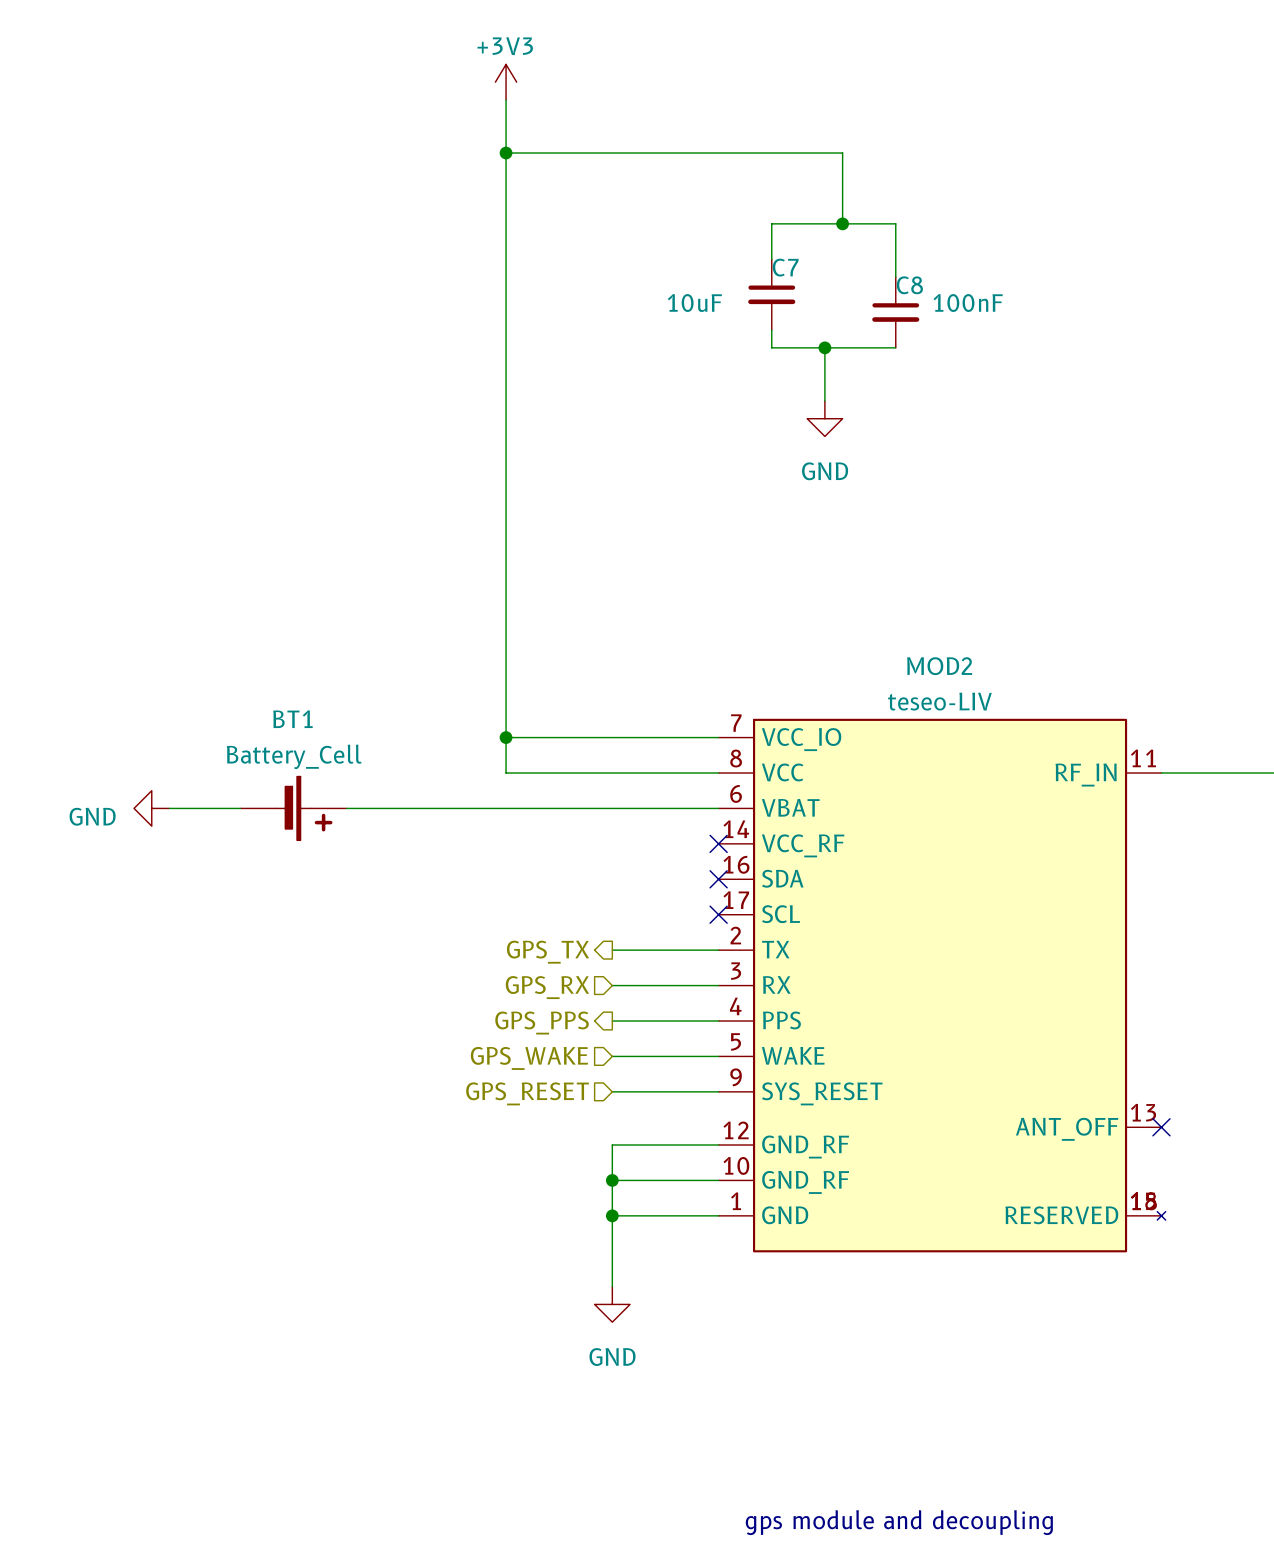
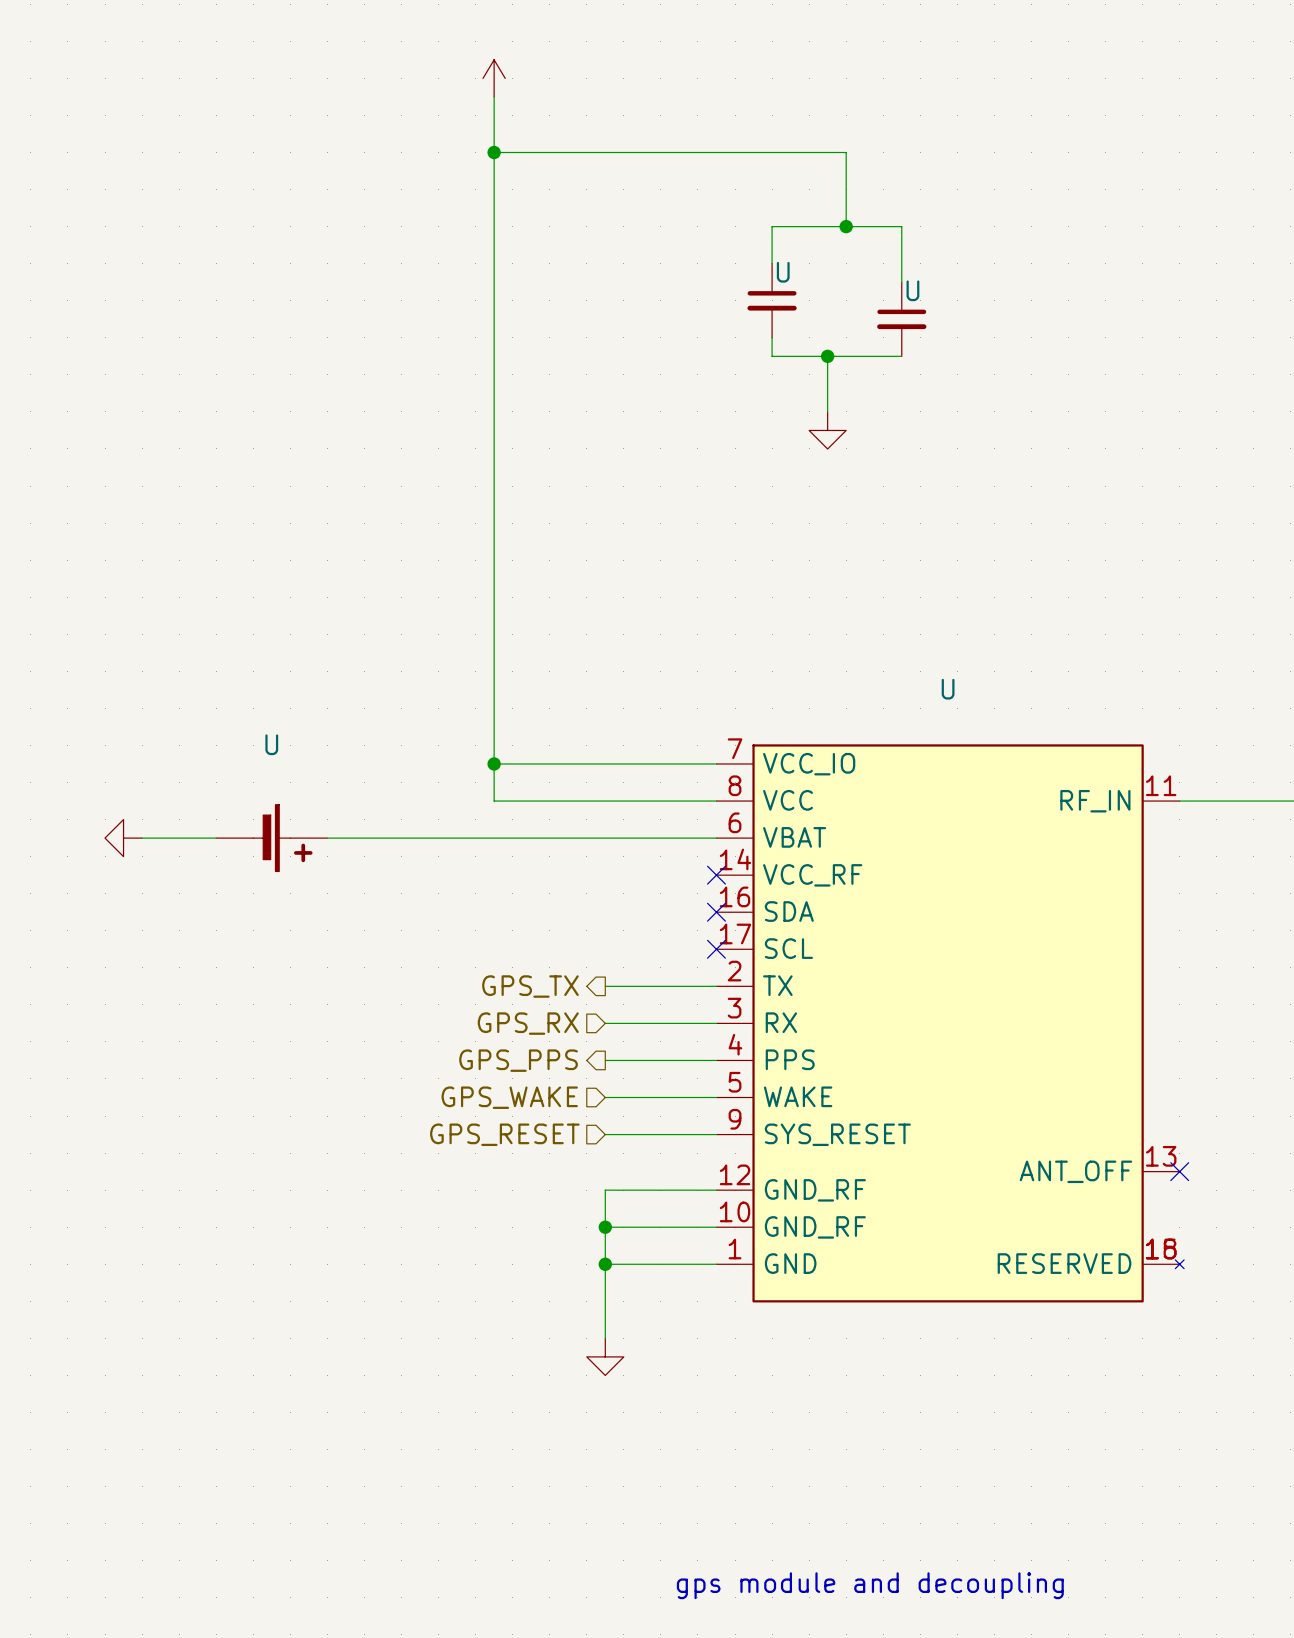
power symbol text: +3V3 (505, 46) -> none
C7 name: C7 (785, 267) -> U (783, 272)
C8 name: C8 (909, 285) -> U (912, 290)
C7 value: 10uF (694, 303) -> none
C8 value: 100nF (968, 303) -> none
power symbol text: GND (825, 471) -> none
MOD2 name: MOD2 (939, 666) -> U (948, 689)
MOD2 value: teseo-LIV (939, 701) -> none
BT1 name: BT1 (292, 719) -> U (271, 744)
BT1 value: Battery_Cell (294, 756) -> none
power symbol text: GND (92, 816) -> none
power symbol text: GND (612, 1357) -> none

